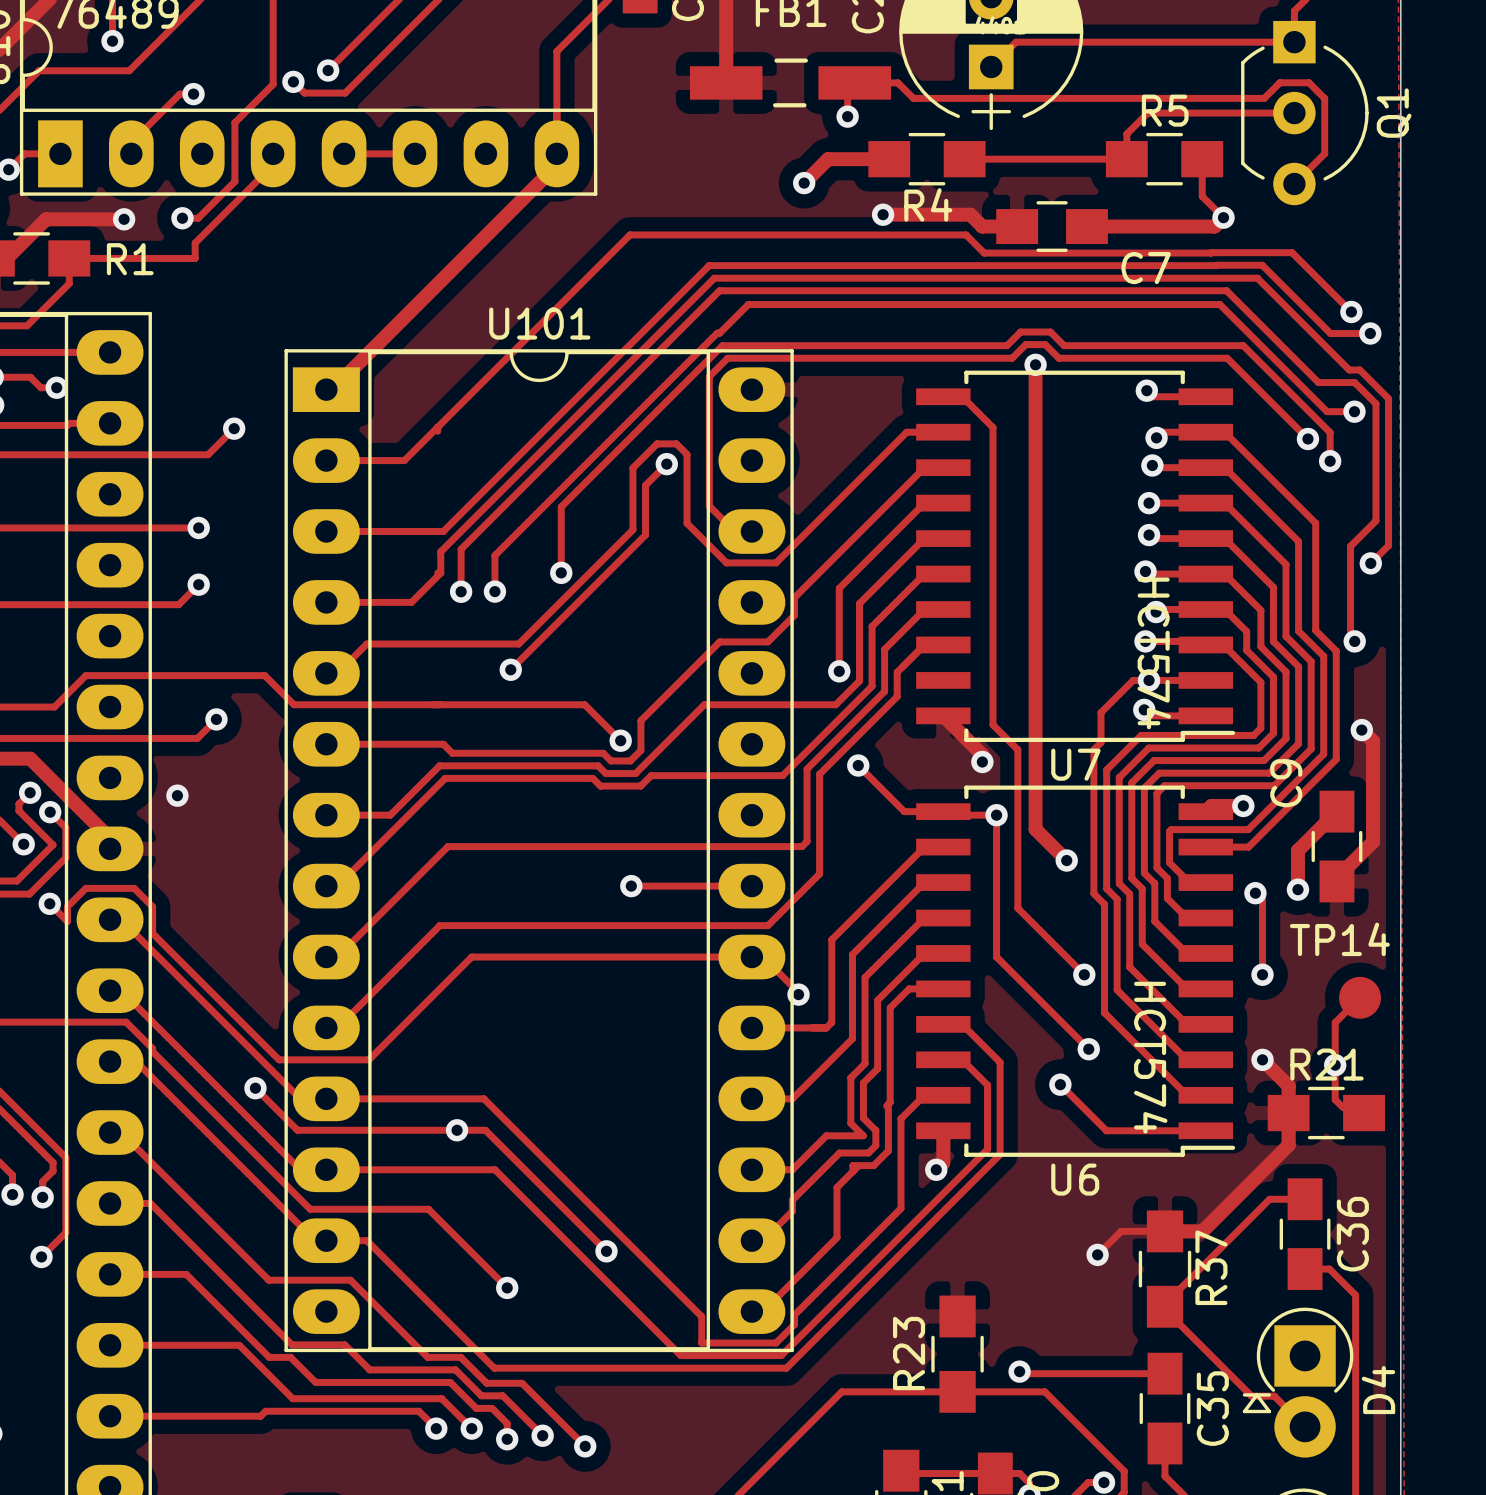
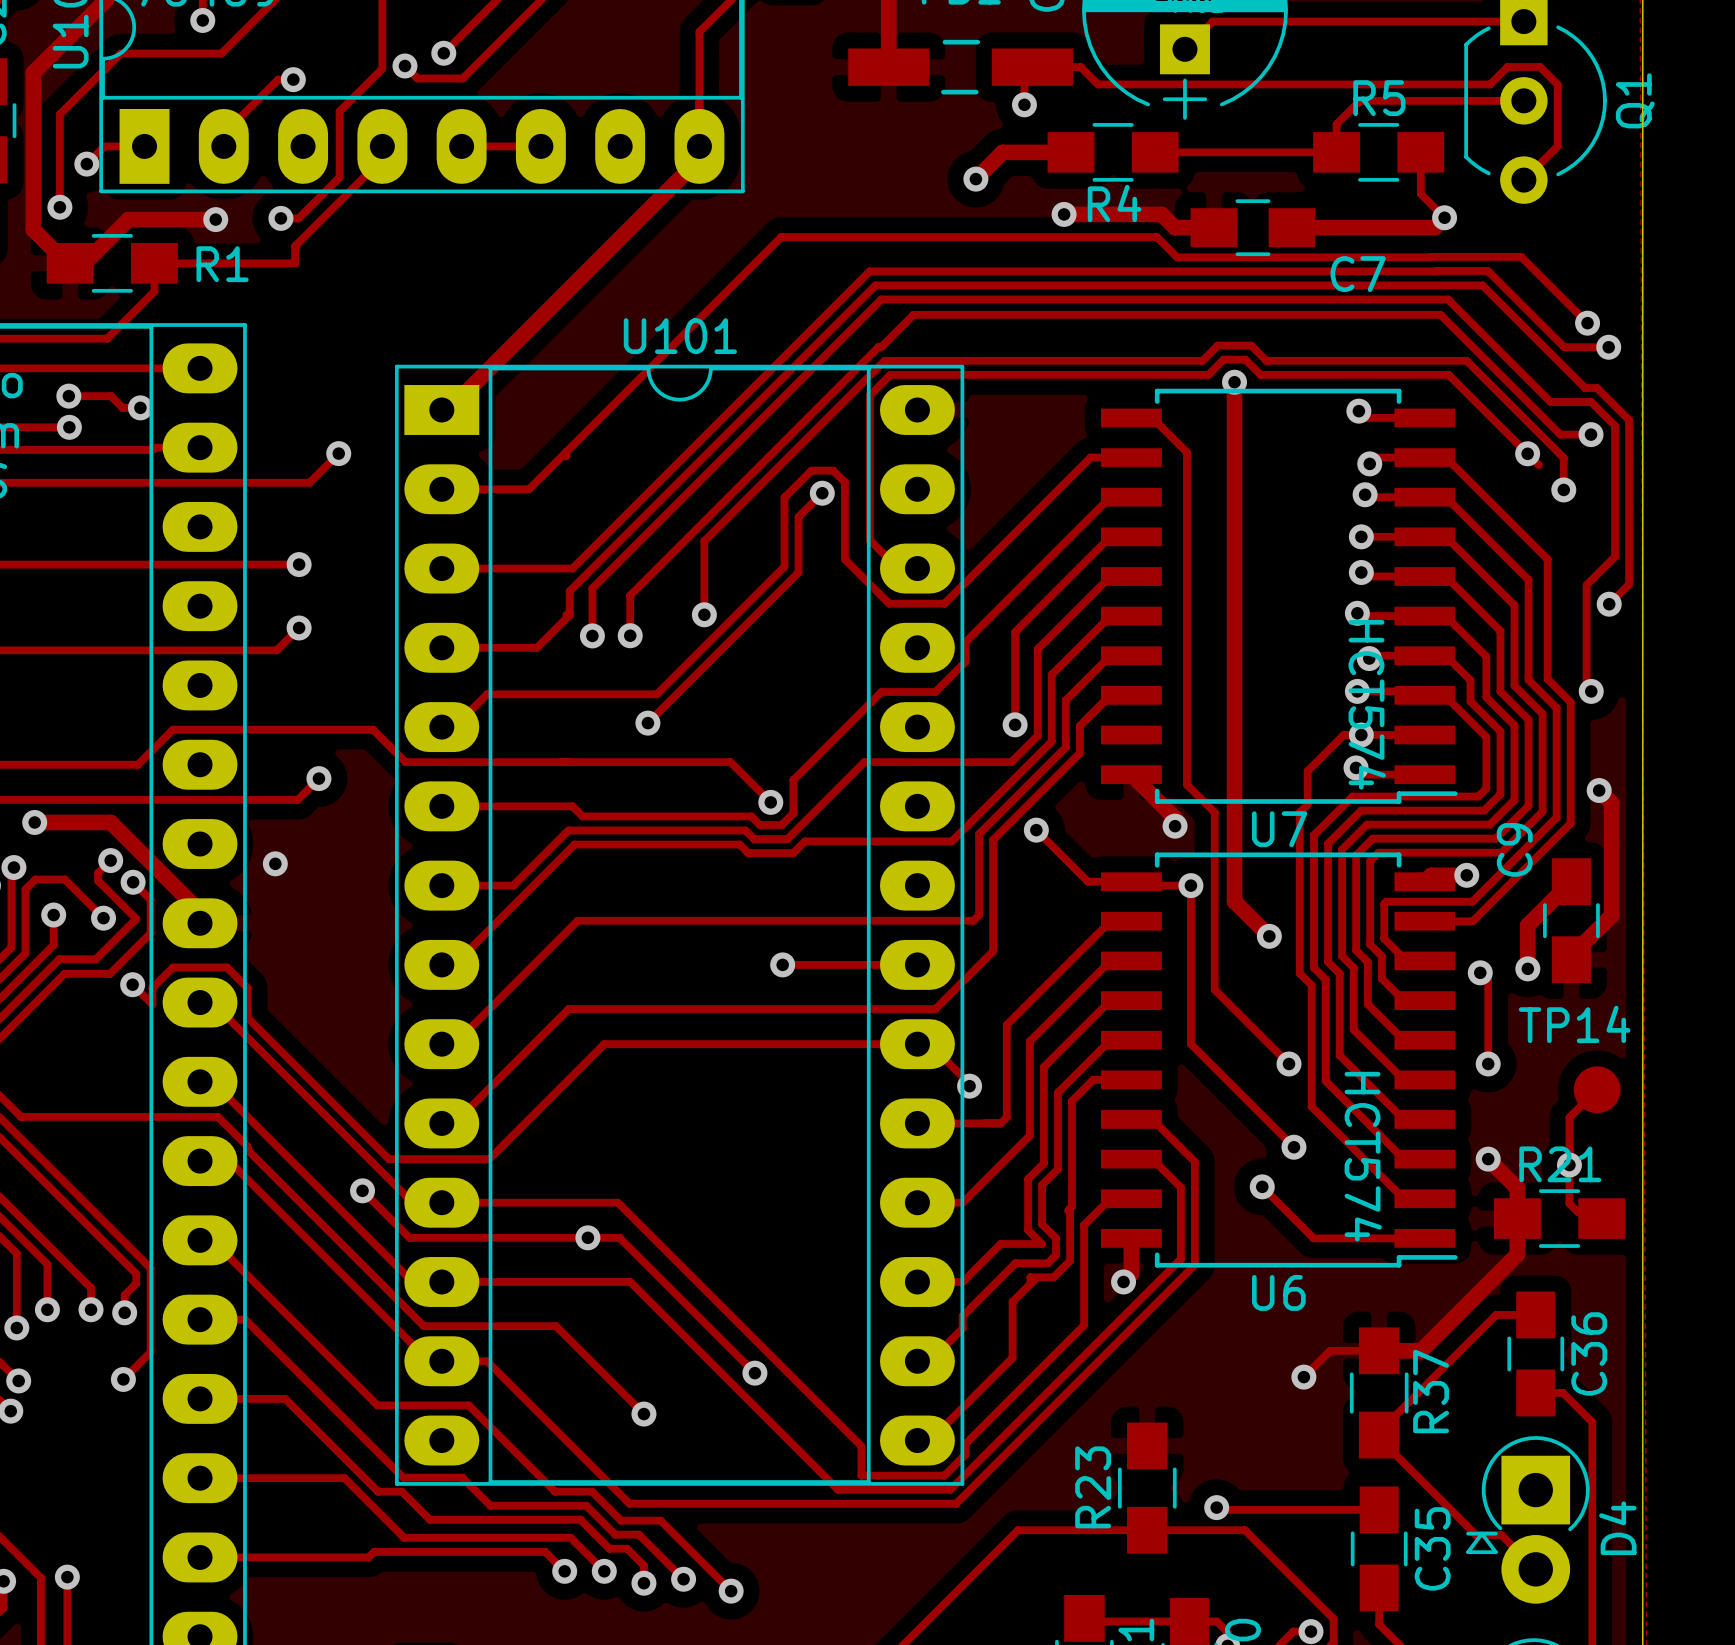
via position: (1307, 439) -> (1527, 453)

